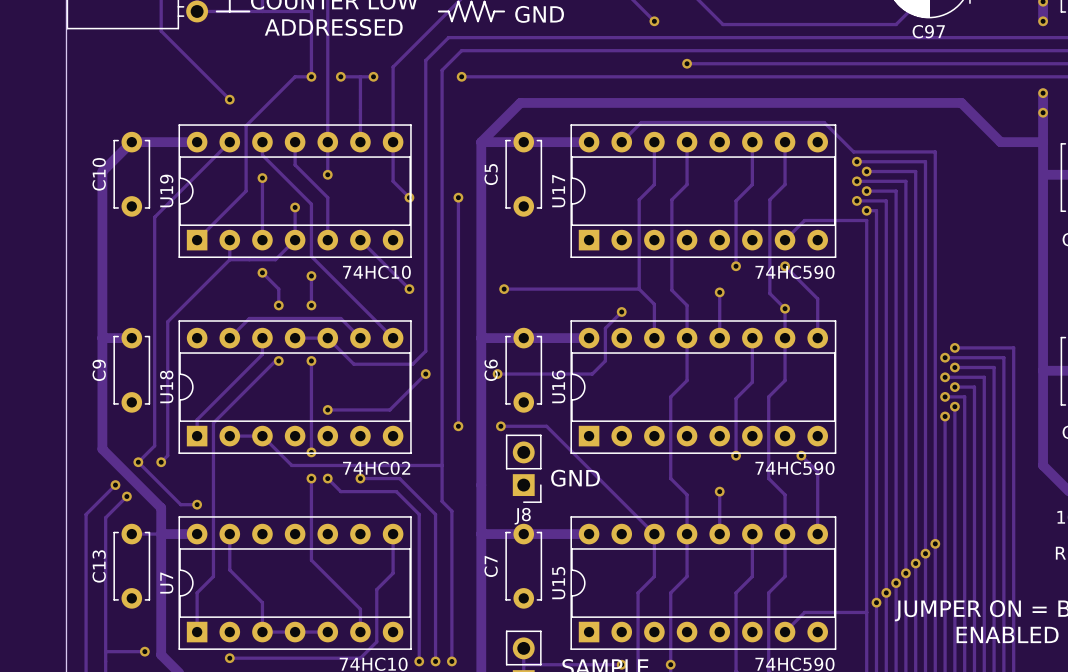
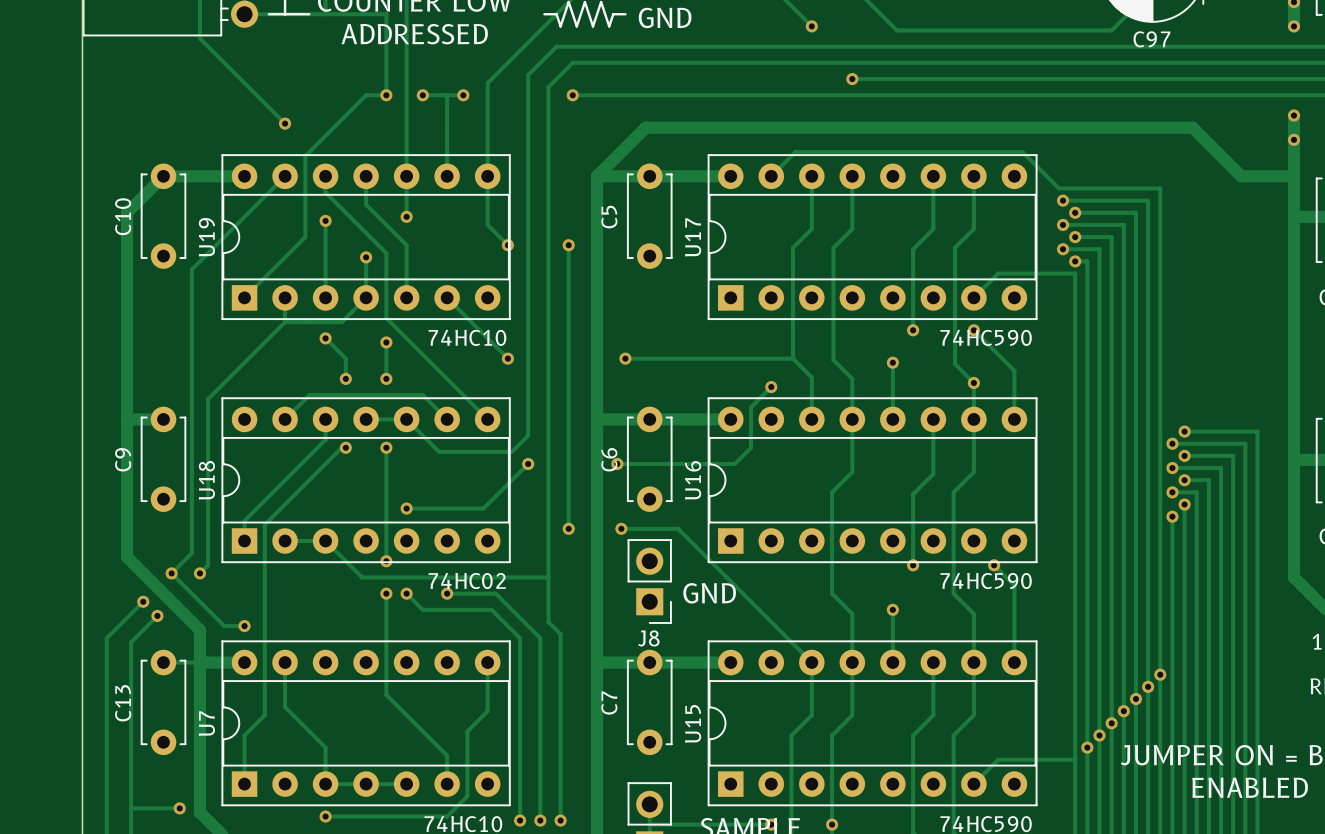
track: (229, 658) (262, 658) -> none
via position: (229, 658) -> (325, 816)

